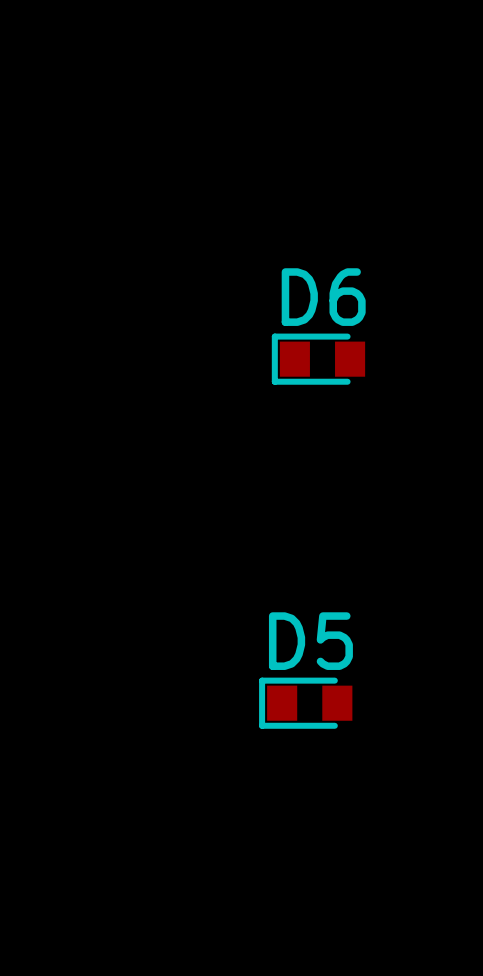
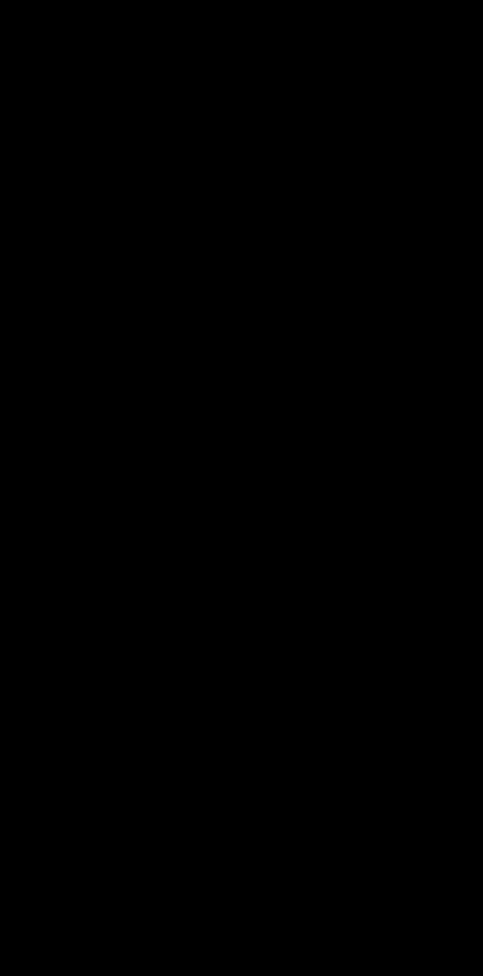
D6: (318, 359) -> none
D5: (305, 703) -> none

